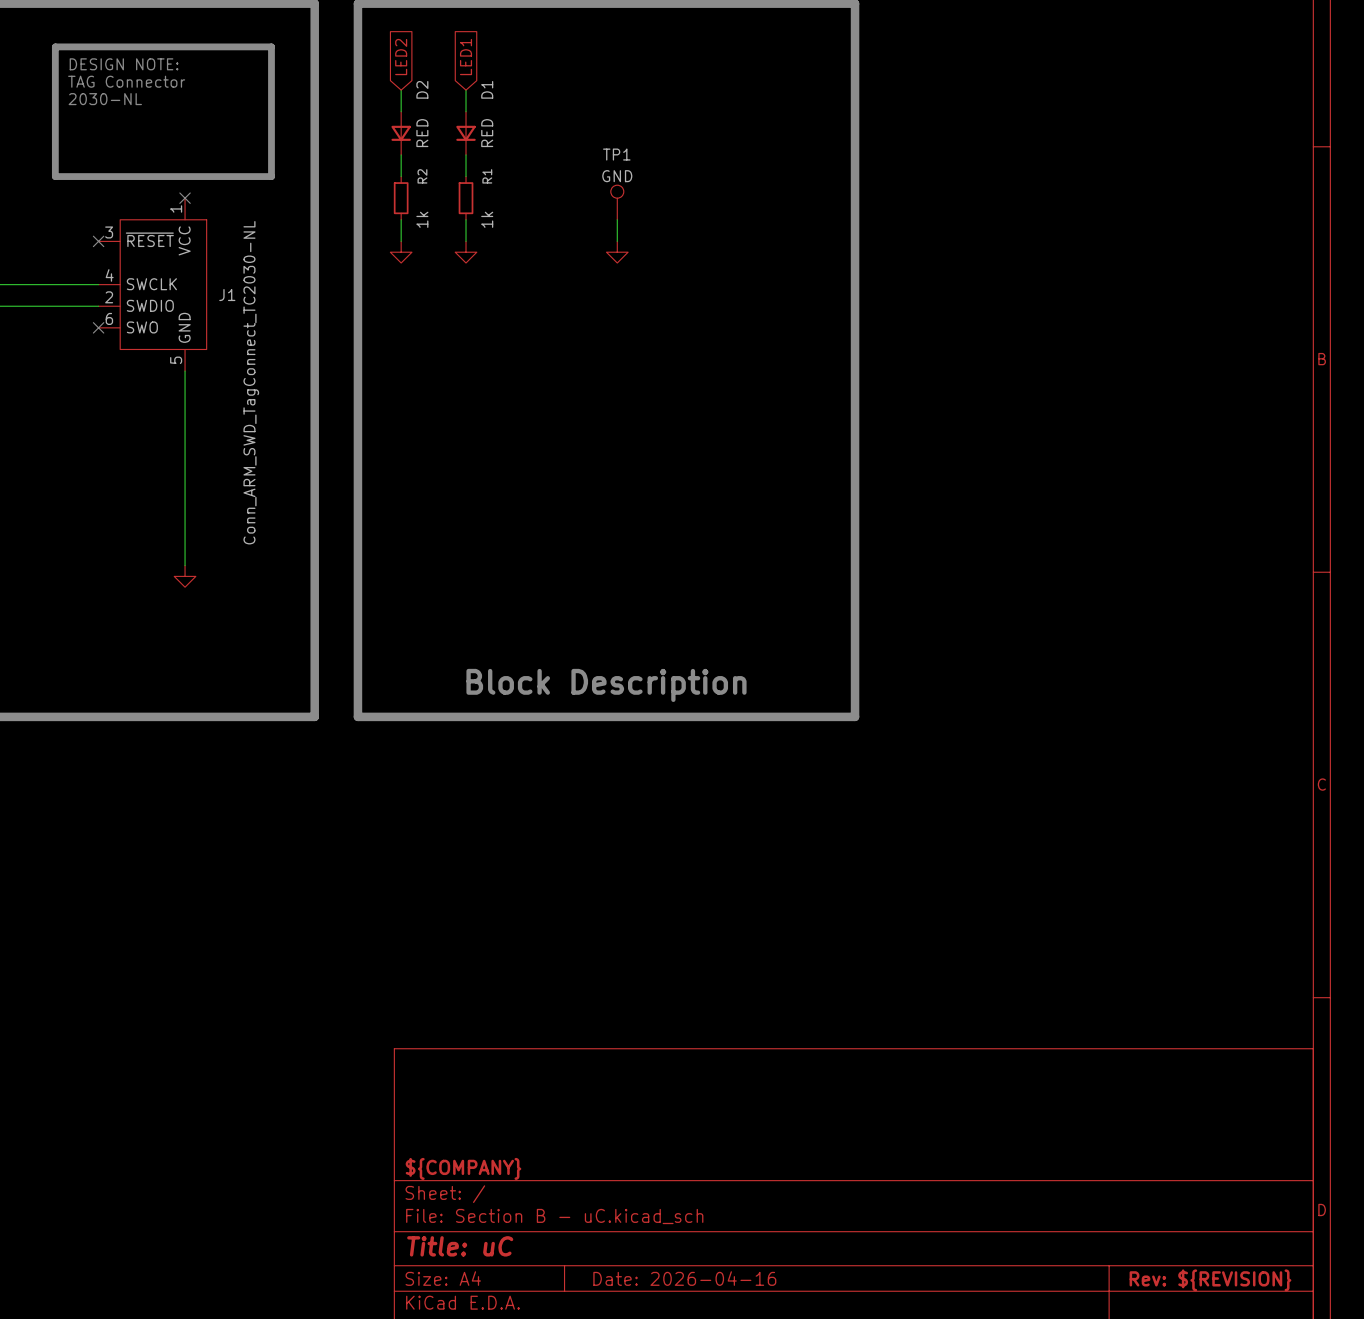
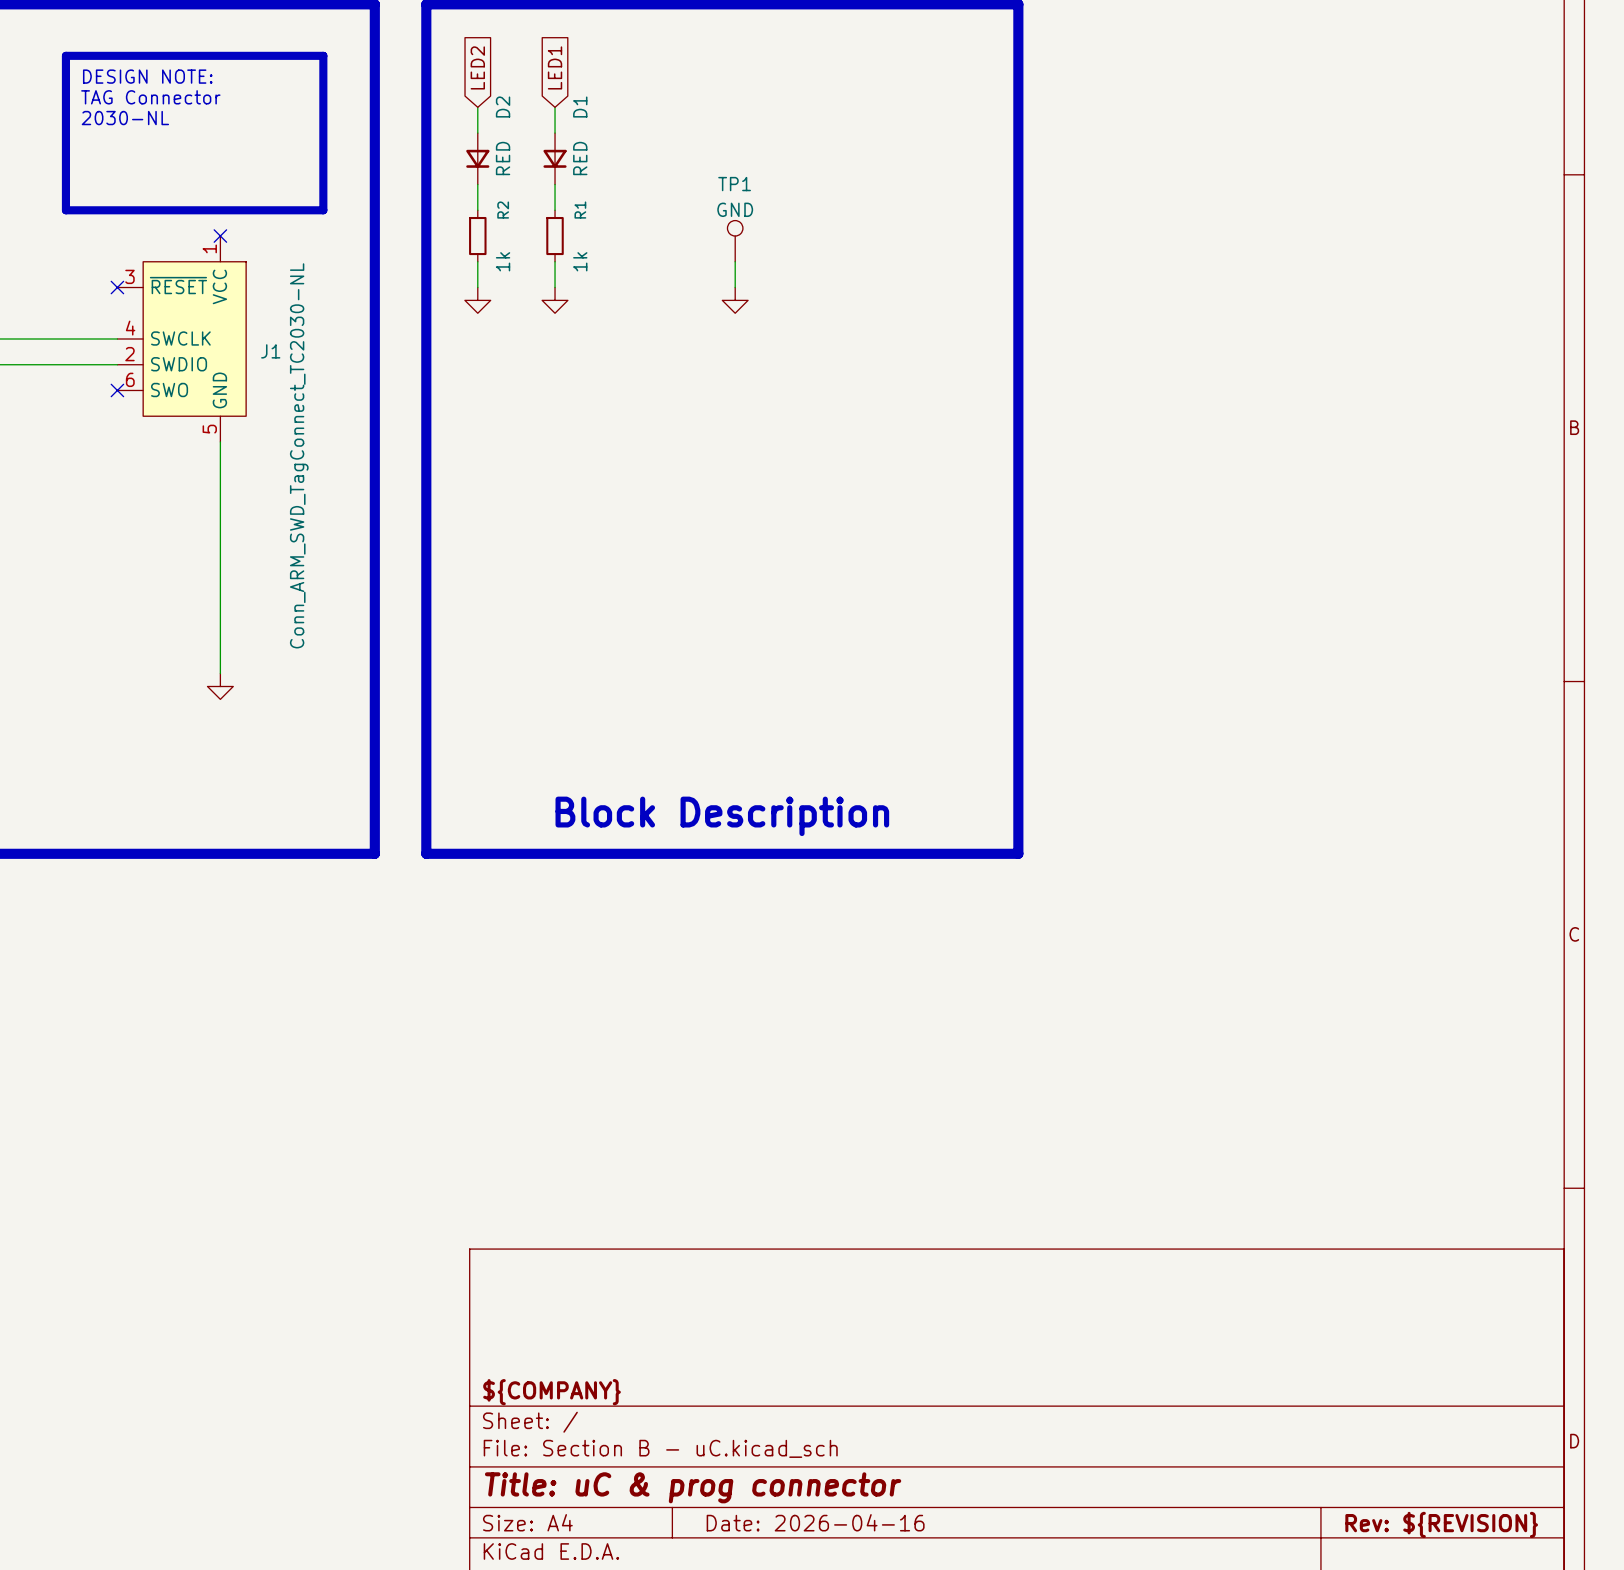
title block: Title: uC (460, 1246) -> Title: uC & prog connector (693, 1487)

